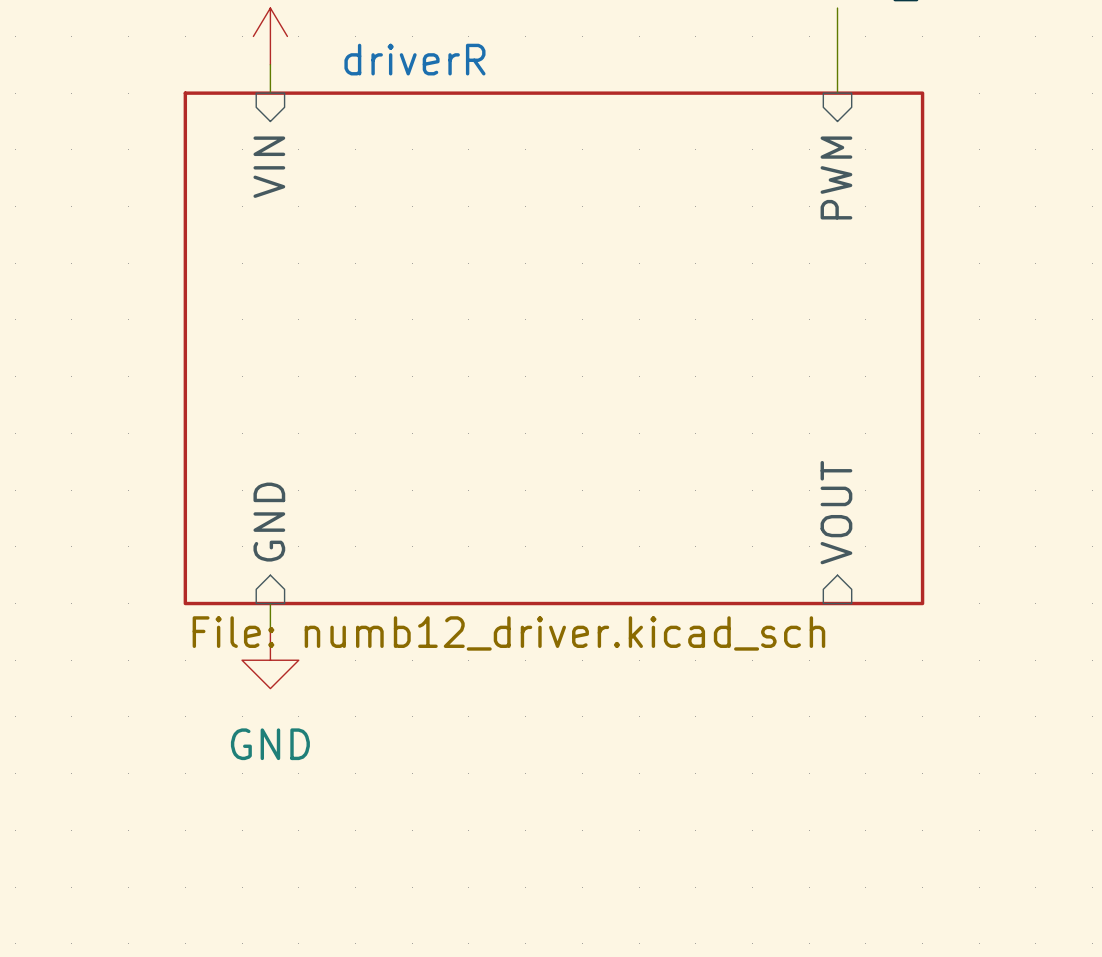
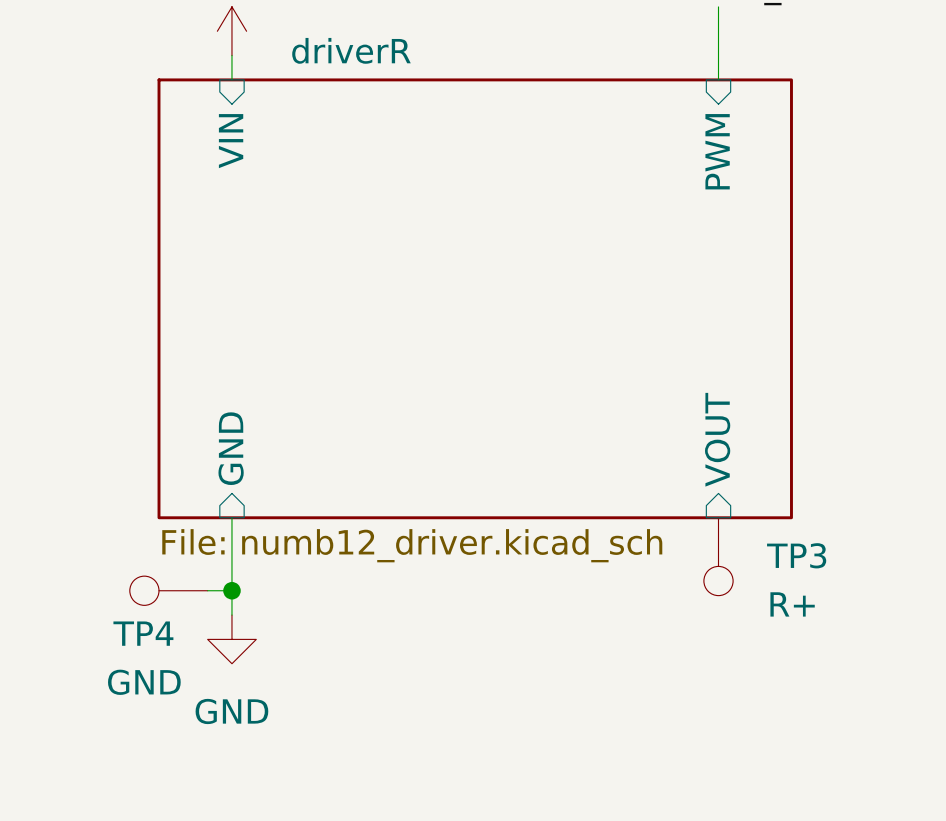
wire: none -> (231, 542) (231, 615)
TP3: none -> R+ (718, 556)
power symbol position: GND (270, 660) -> GND (231, 639)
TP4: none -> GND (168, 590)
wire: none -> (207, 590) (231, 590)
junction: none -> (231, 590)

